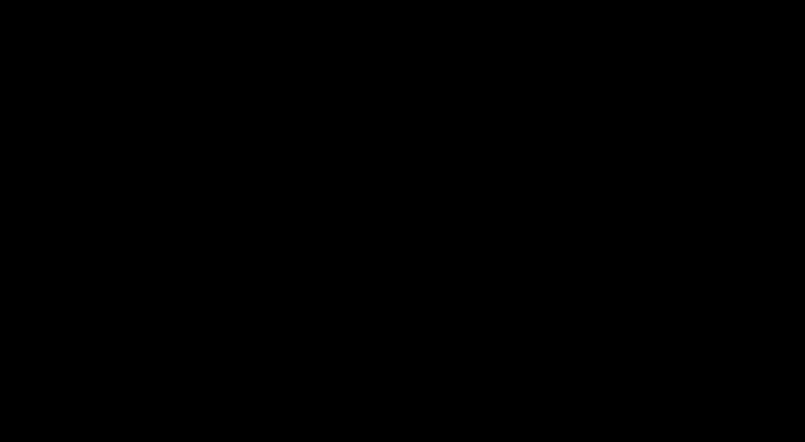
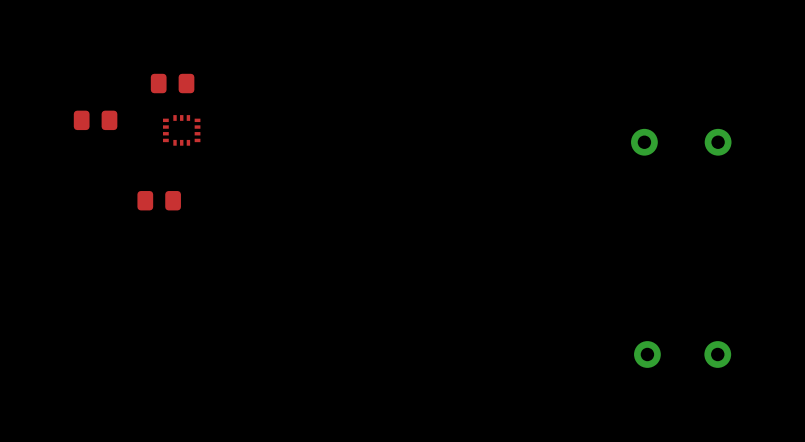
part: none -> (172, 83)
part: none -> (95, 120)
part: none -> (181, 130)
part: none -> (644, 142)
part: none -> (718, 142)
part: none -> (159, 200)
part: none -> (647, 354)
part: none -> (717, 354)

